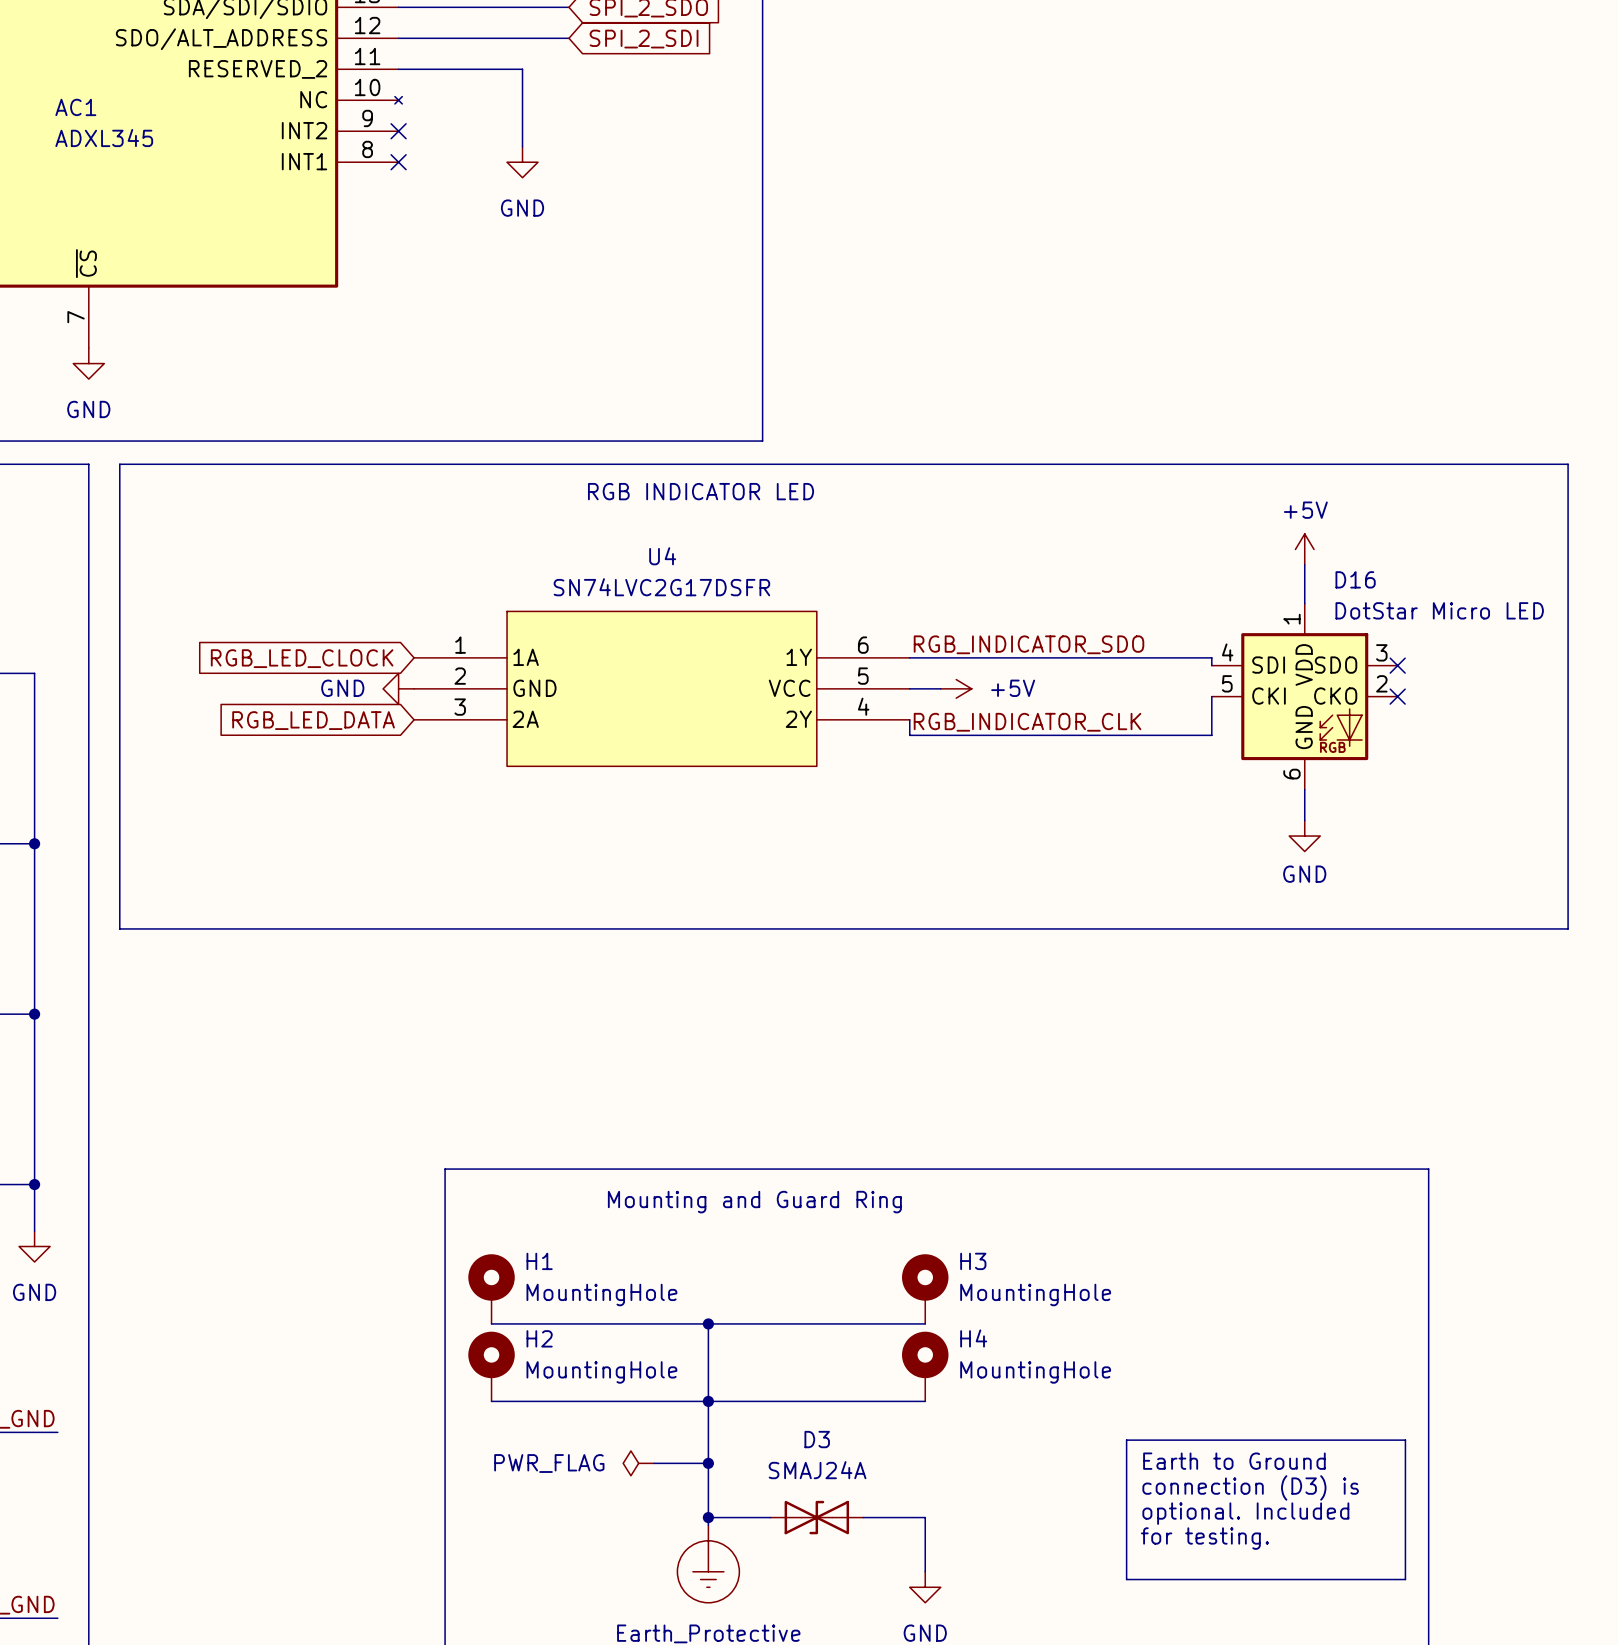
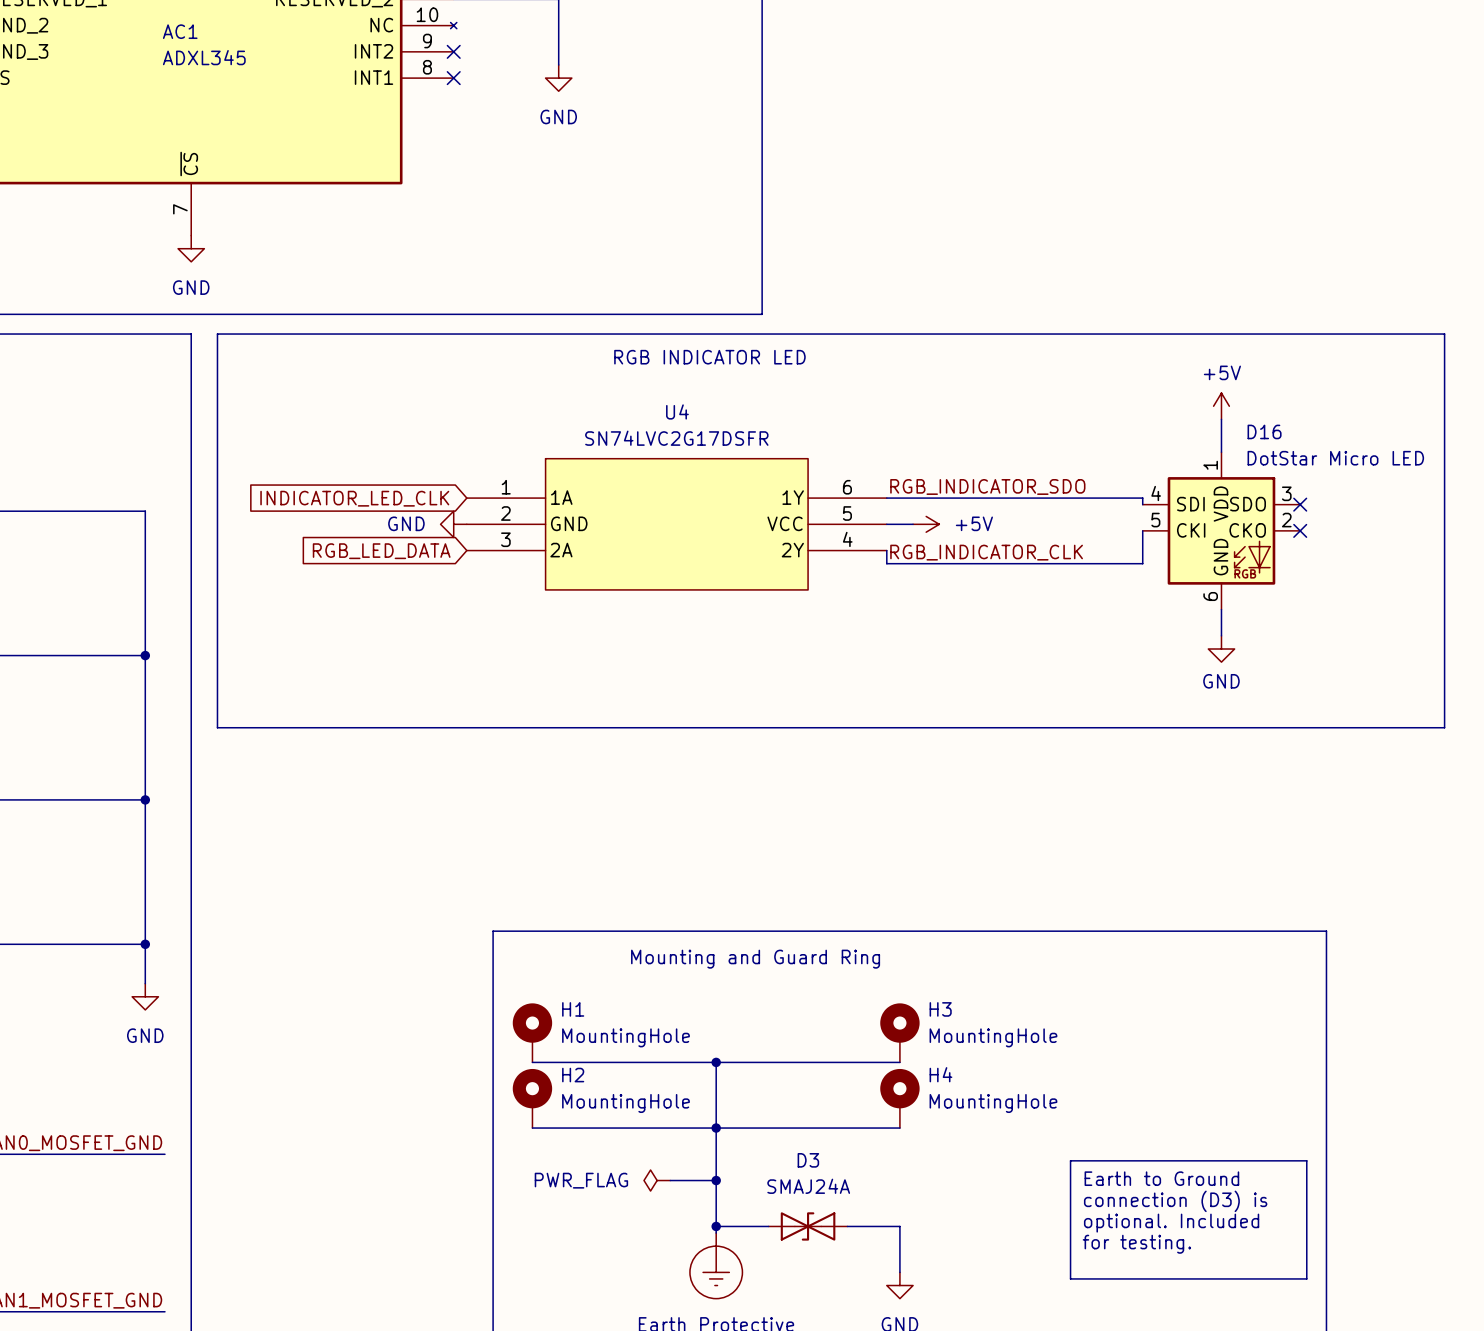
global label: RGB_LED_CLOCK (302, 658) -> INDICATOR_LED_CLK (354, 498)

